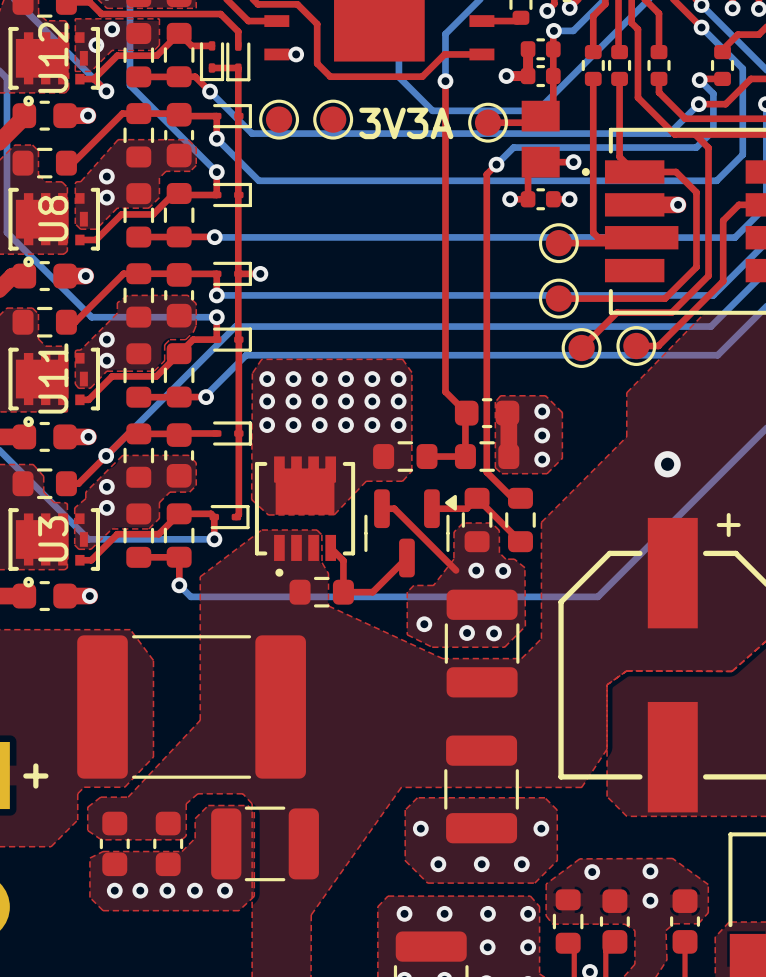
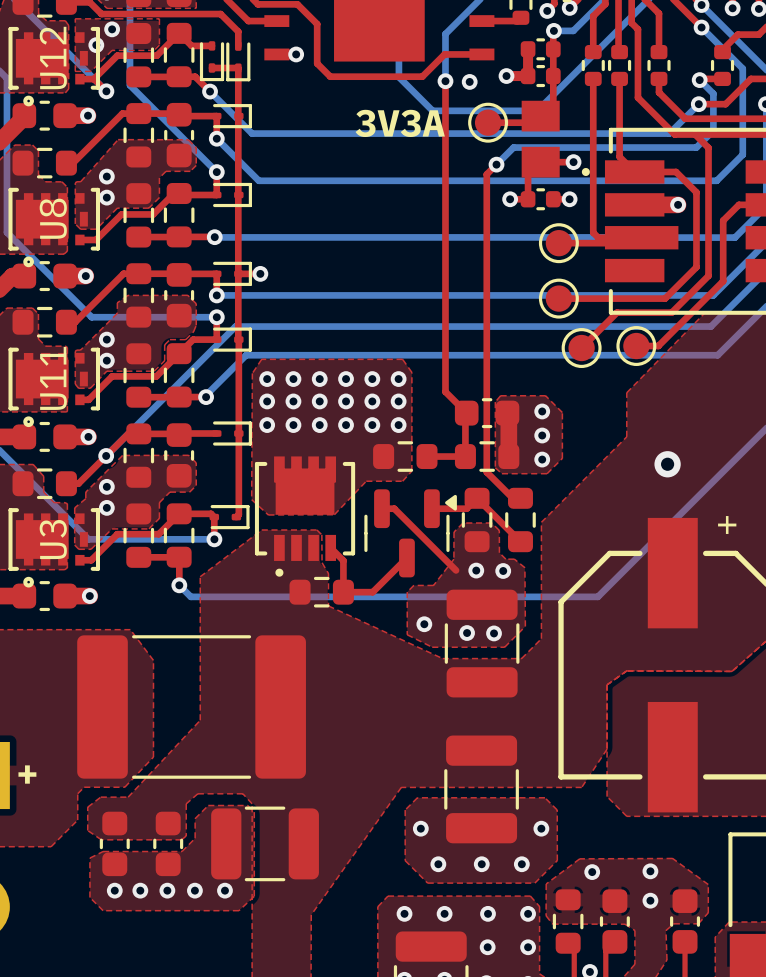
via: none -> (469, 81)
part: (279, 119) -> none
part: (333, 119) -> none

